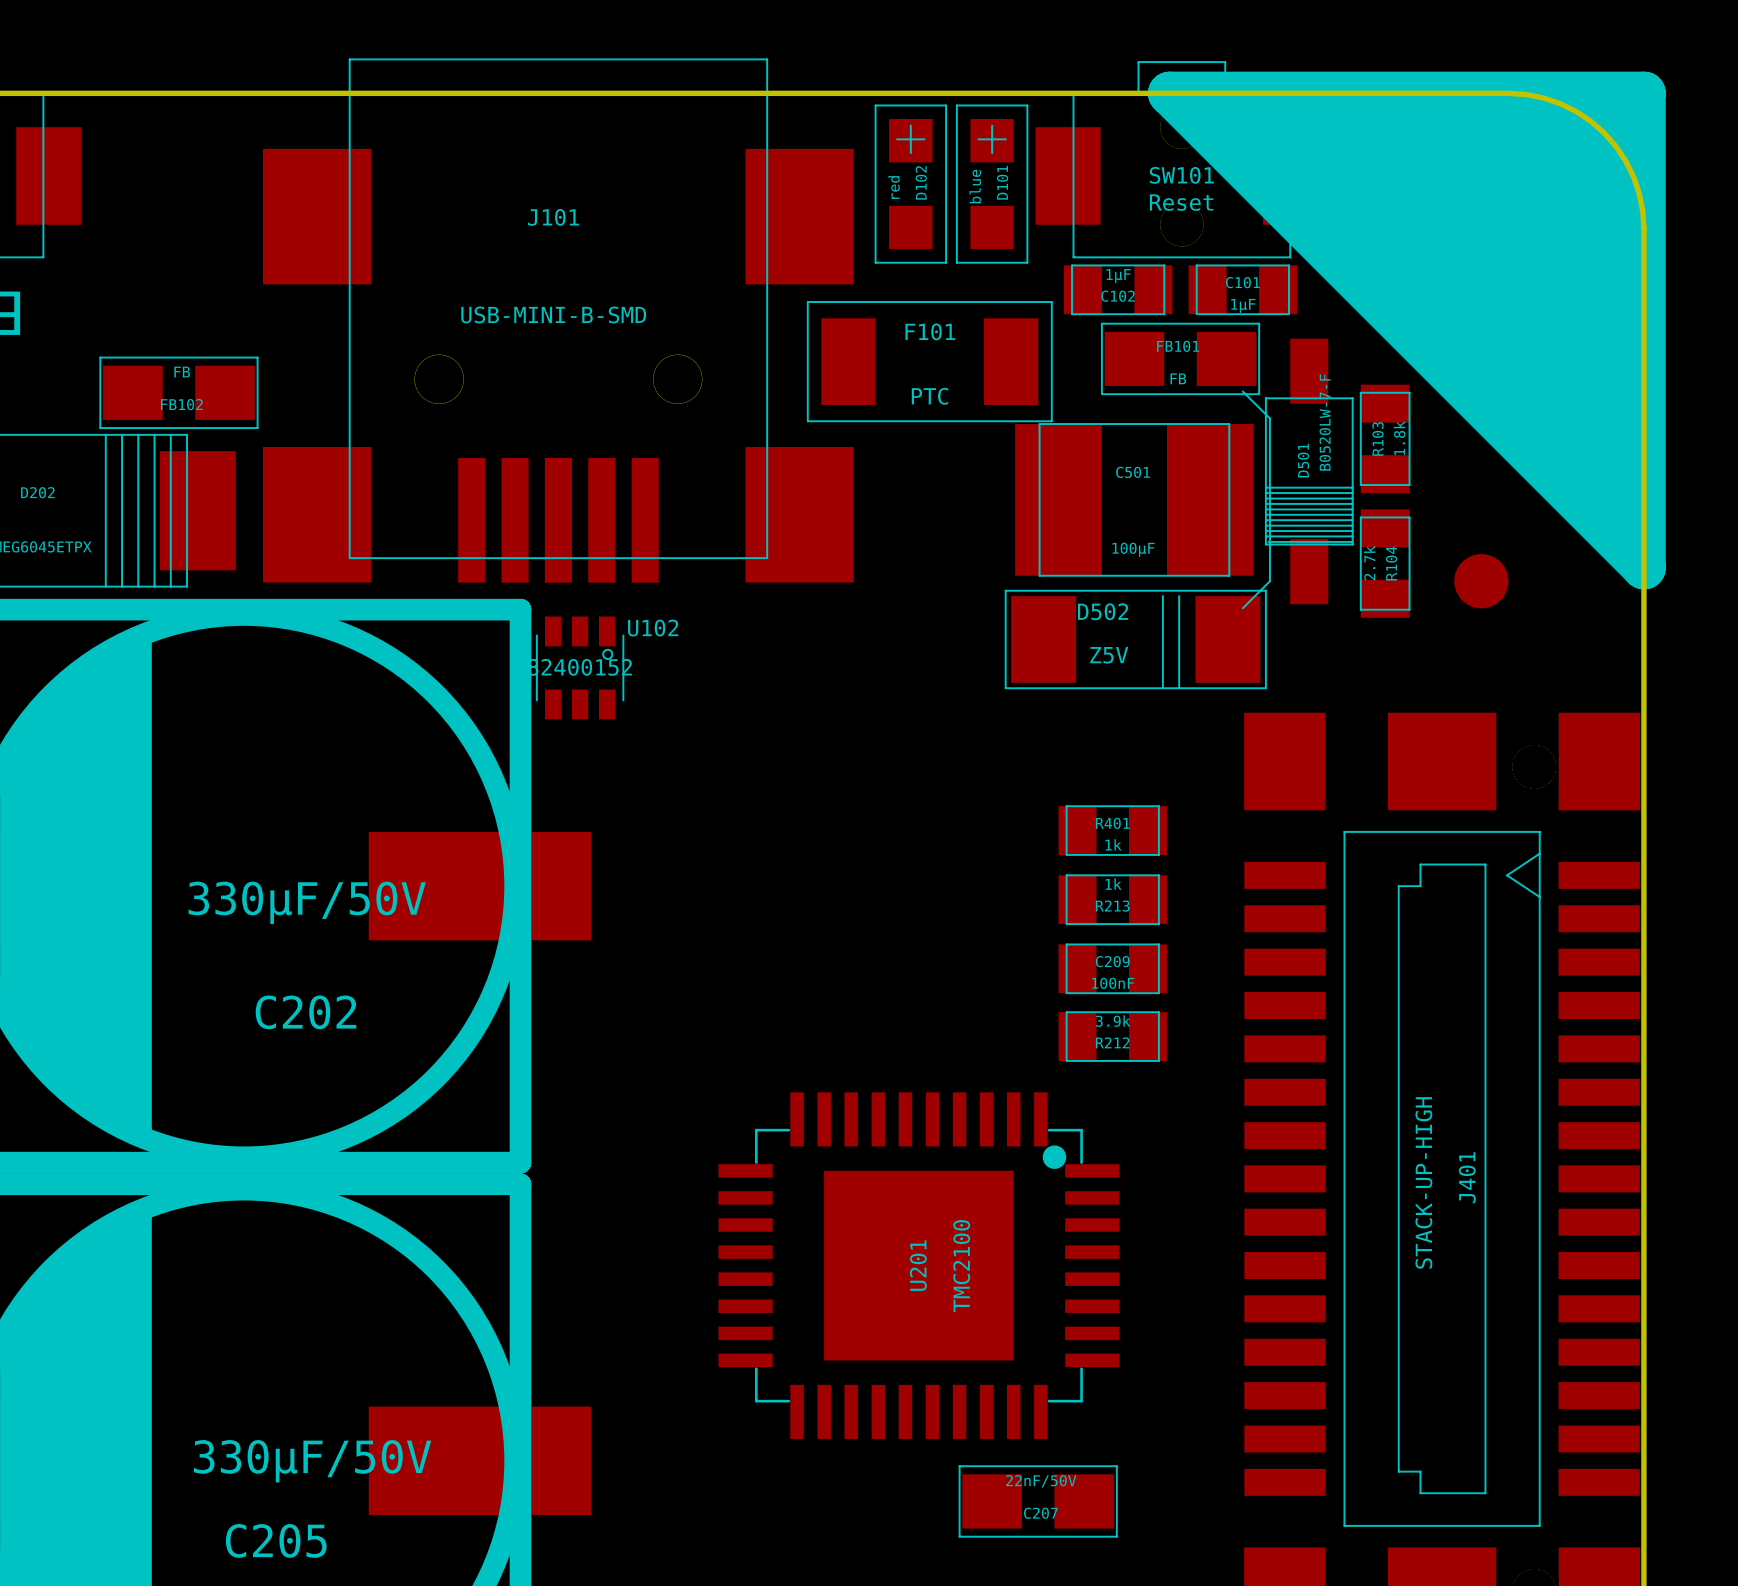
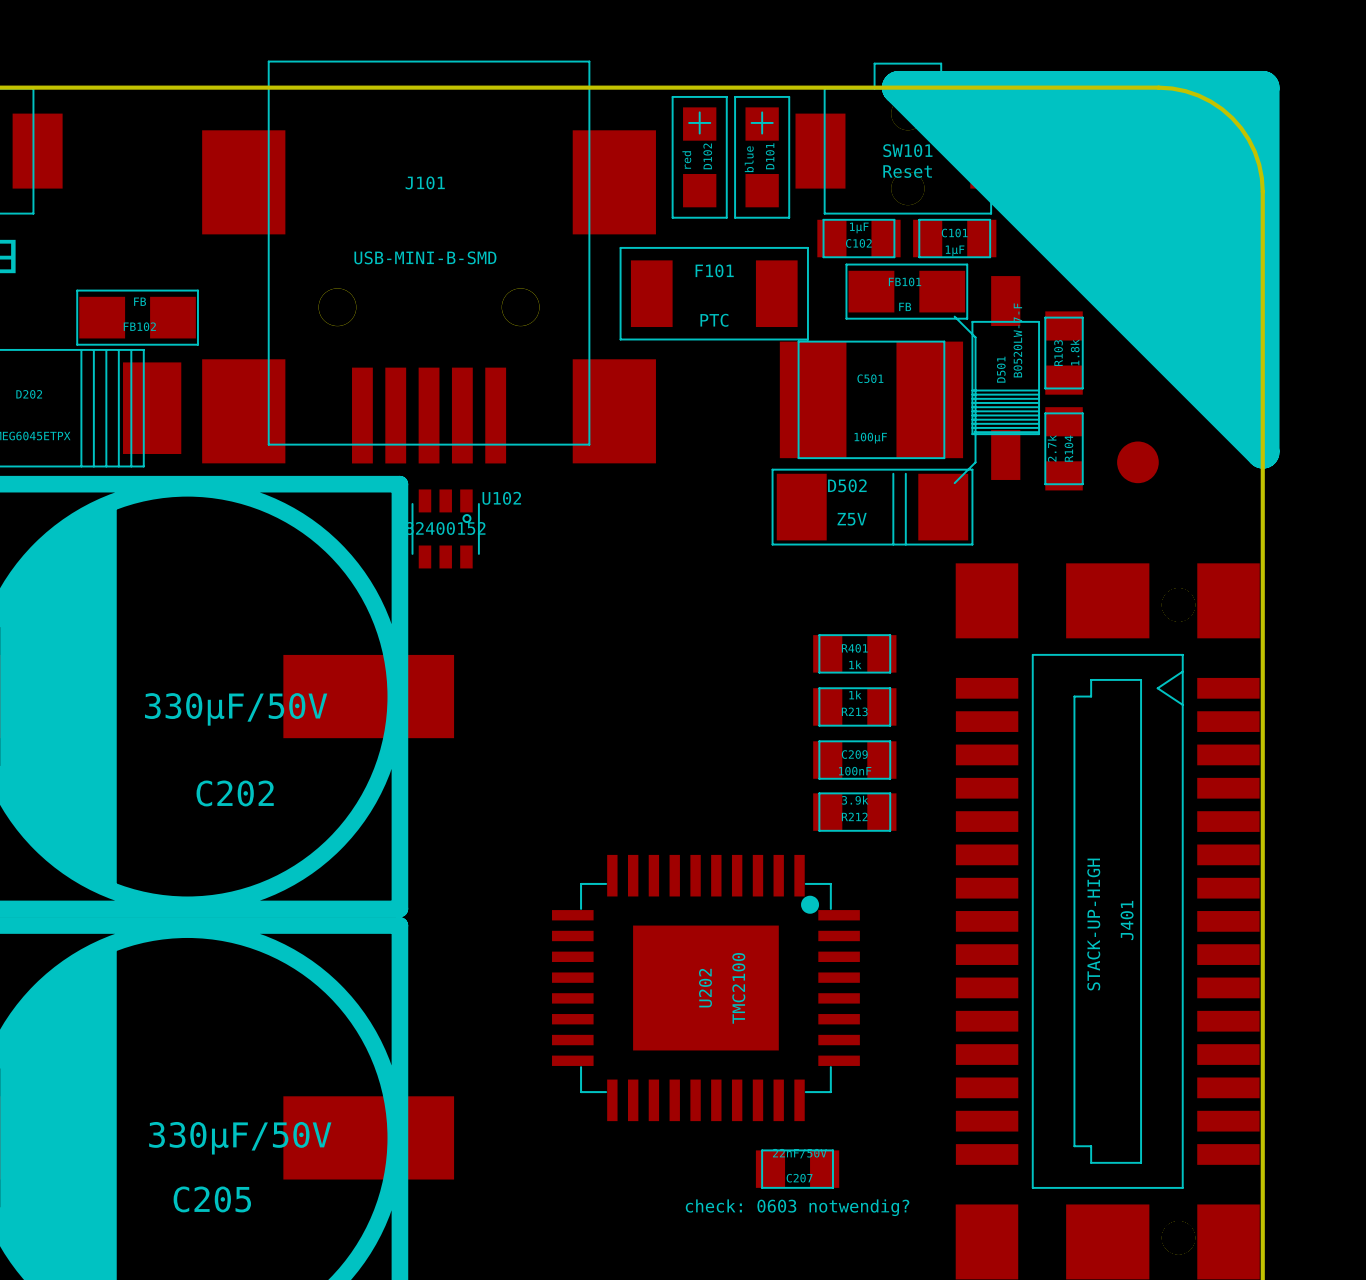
U201: TMC2100 (918, 1265) -> none
U202: none -> TMC2100 (705, 988)
C207 footprint: [959, 1466, 1117, 1537] -> [755, 1150, 840, 1188]
text: none -> check: 0603 notwendig? (797, 1207)

